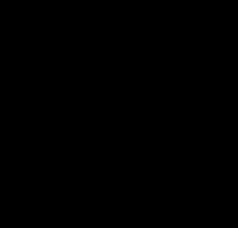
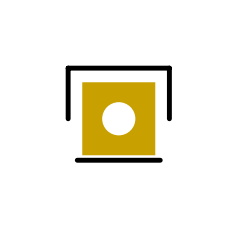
part: none -> (118, 114)

